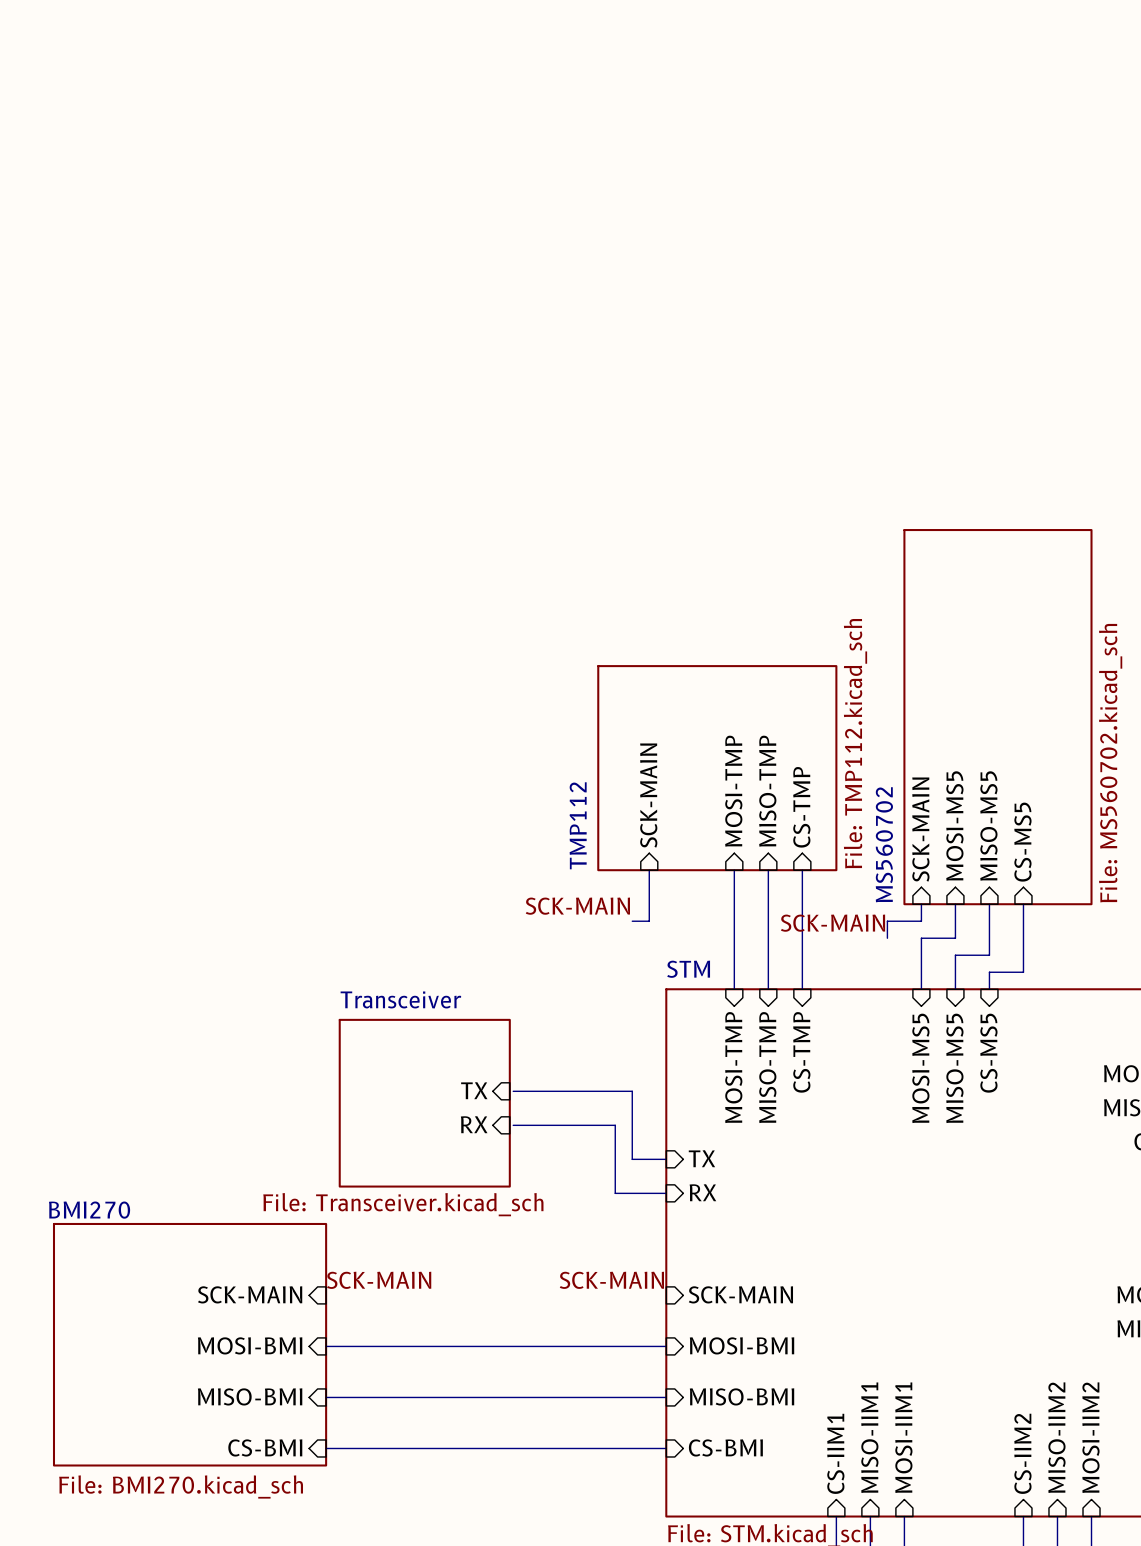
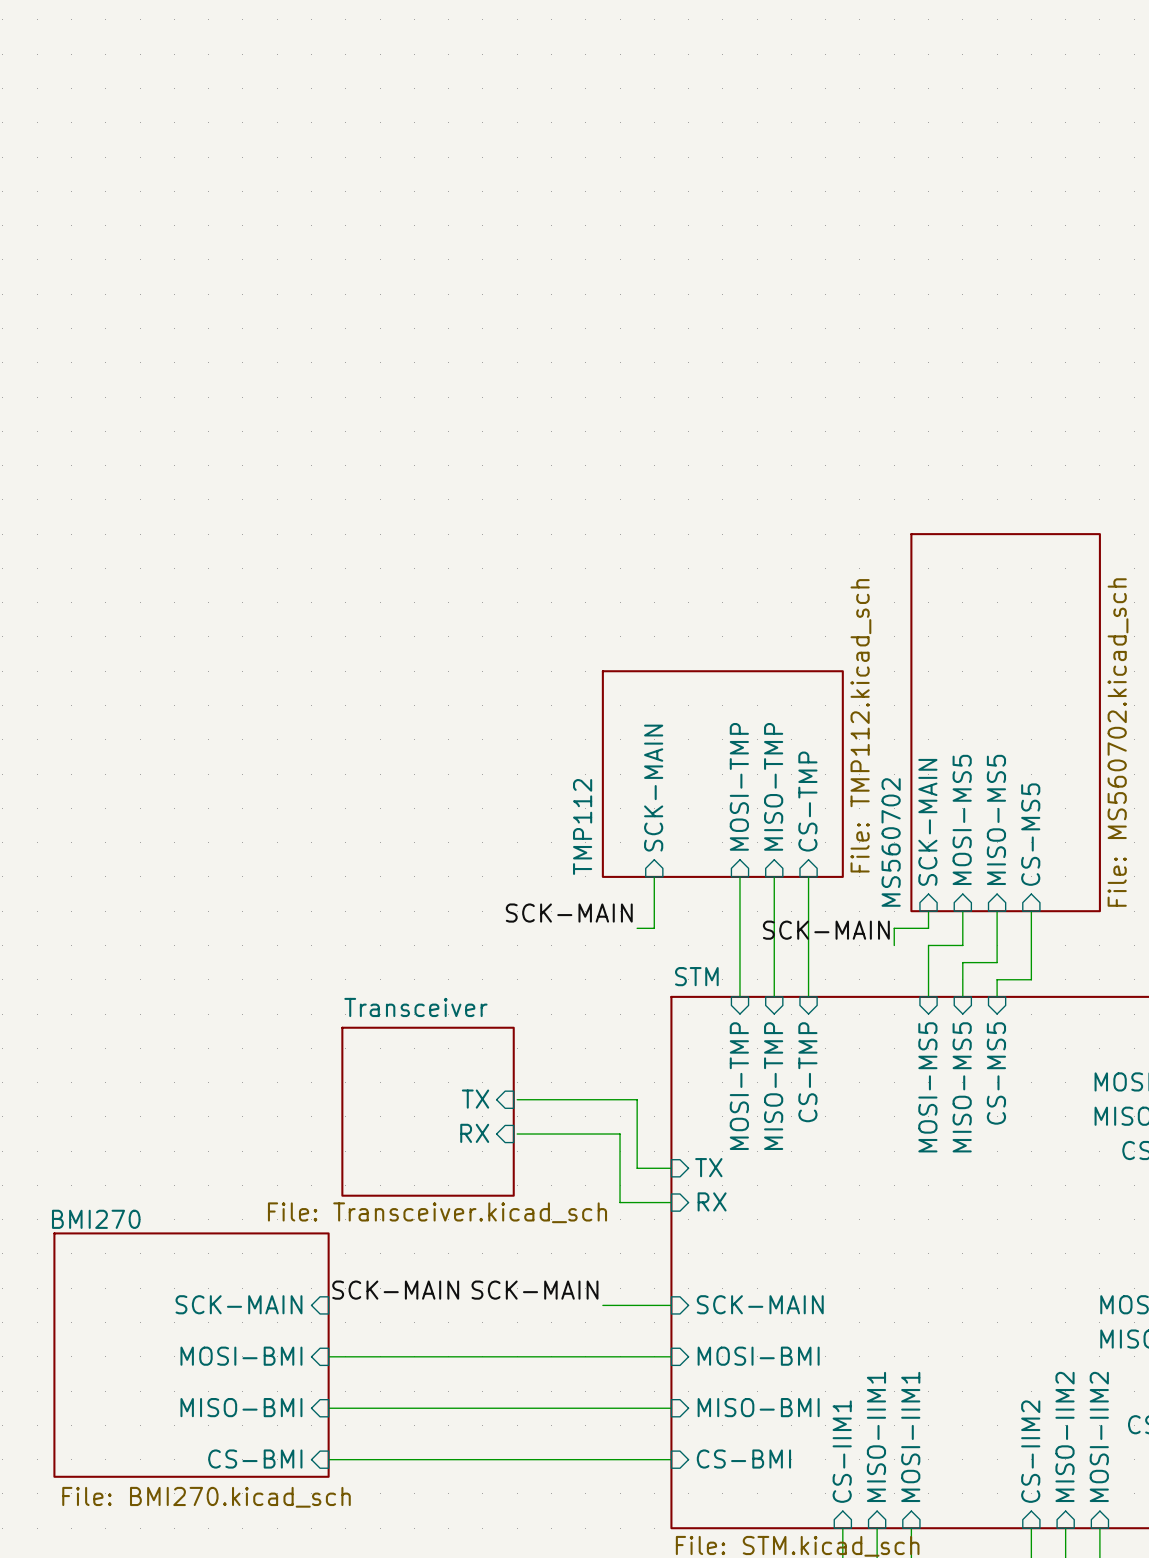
label position: SCK-MAIN (611, 1280) -> SCK-MAIN (535, 1290)
wire: none -> (602, 1305) (671, 1305)

